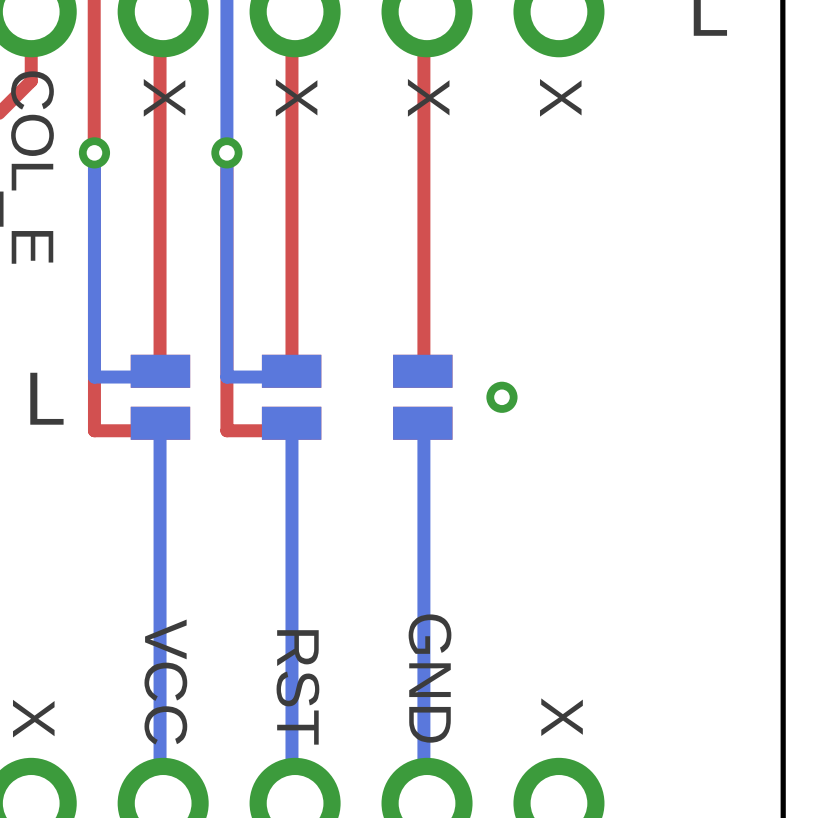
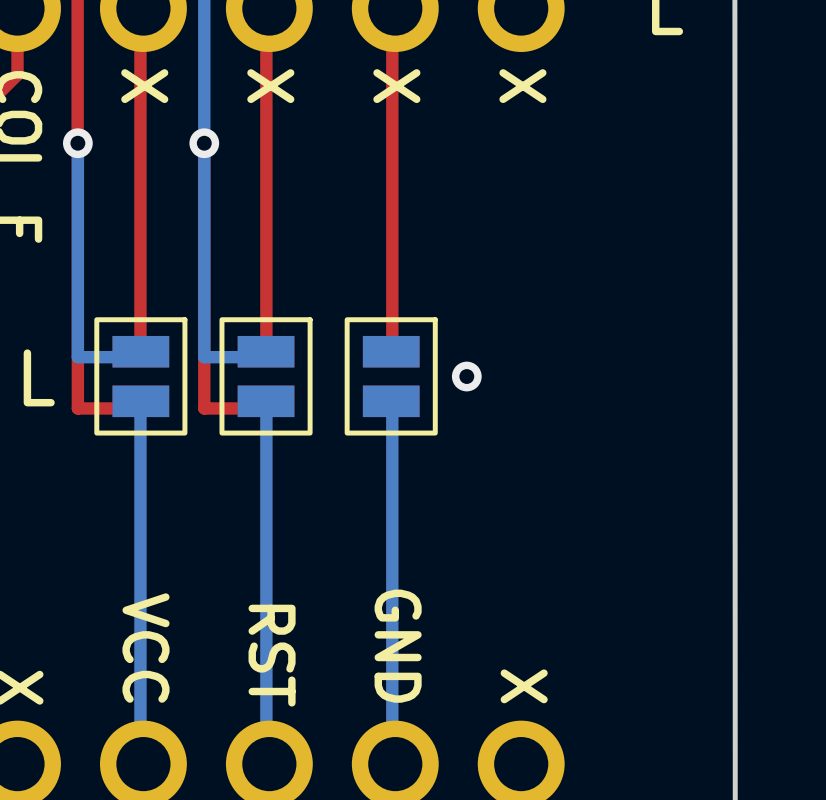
part footprint: [130, 354, 191, 440] -> [94, 317, 188, 436]
part footprint: [261, 354, 322, 440] -> [219, 317, 313, 436]
part footprint: [393, 354, 453, 440] -> [344, 317, 438, 436]

